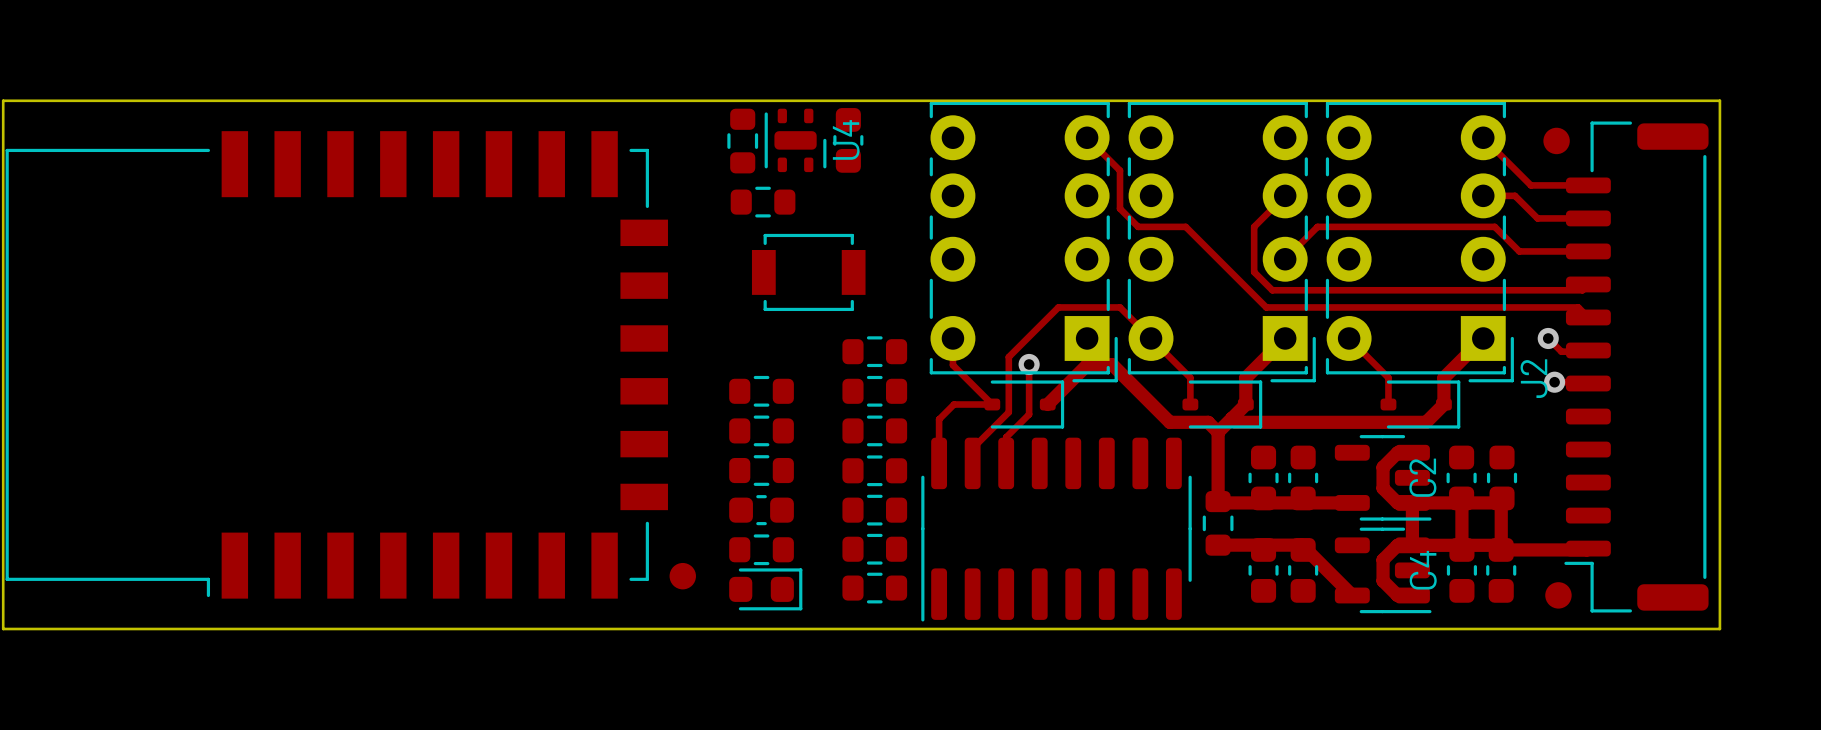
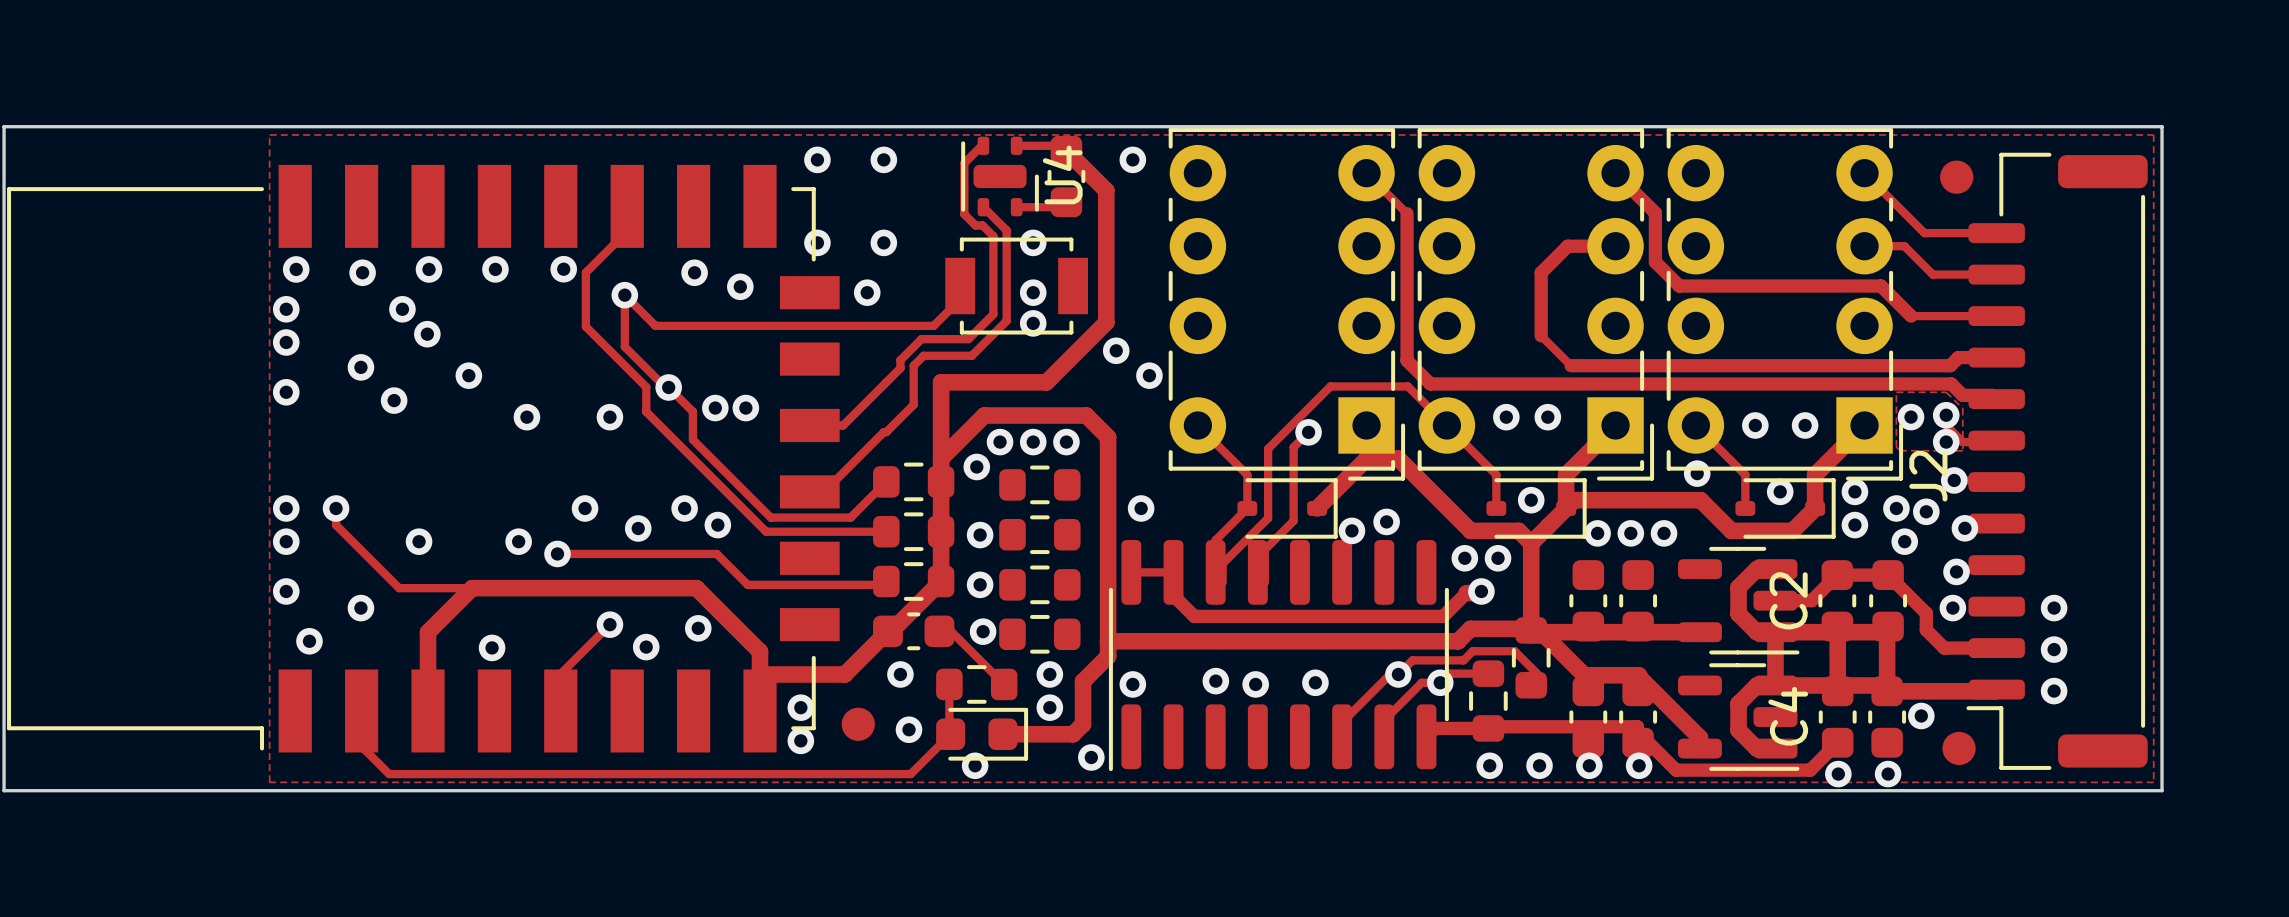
zone outline: none -> (269, 134) (269, 782) (2153, 782) (2153, 134) (269, 134)
track: none -> (983, 145) (964, 163) (964, 214) (975, 225) (982, 225) (993, 236) (993, 314) (968, 339) (921, 339) (900, 360) (900, 368) (843, 425) (809, 425)
track: none -> (1016, 145) (1061, 145) (1106, 190) (1106, 322) (1046, 382) (941, 382) (941, 581) (844, 674) (764, 674) (760, 678)
via: none -> (817, 159)
via: none -> (883, 159)
via: none -> (1132, 159)
part: (742, 141) -> none
track: none -> (1066, 202) (1061, 207) (1016, 207)
track: none -> (627, 206) (627, 231) (585, 272) (585, 326) (646, 387) (646, 411) (766, 531) (886, 531)
track: none -> (983, 207) (1006, 230) (1006, 320) (971, 355) (923, 355) (913, 365) (913, 404) (824, 491) (809, 491)
track: (1119, 169) (1120, 208) (1138, 226) (1185, 226) (1226, 267) -> (1615, 246) (1567, 246) (1541, 272) (1541, 335)
track: none -> (1407, 213) (1407, 360) (1430, 383) (1951, 383) (1962, 395) (1992, 395)
via: none -> (817, 242)
via: none -> (883, 242)
via: none -> (1033, 242)
track: (1285, 195) (1254, 226) (1254, 272) (1272, 290) (1582, 290) (1588, 284) -> none
part: (763, 202) -> none
via: none -> (296, 269)
via: none -> (429, 269)
via: none -> (495, 269)
via: none -> (563, 269)
via: none -> (362, 272)
via: none -> (694, 272)
track: none -> (960, 286) (960, 299) (933, 325) (655, 325) (624, 295) (624, 346) (692, 411) (692, 439) (770, 517) (850, 517) (886, 481)
via: none -> (740, 286)
via: none -> (867, 292)
via: none -> (1033, 292)
via: none -> (624, 295)
via: none -> (286, 309)
via: none -> (402, 309)
track: (1520, 251) (1494, 226) (1317, 226) (1285, 259) -> (1911, 316) (1881, 286) (1679, 286) (1655, 262) (1655, 213) (1615, 173)
via: none -> (1033, 323)
via: none -> (427, 334)
via: none -> (286, 342)
part position: (808, 272) -> (1016, 286)
via: none -> (1116, 350)
track: (1249, 290) (1266, 307) (1578, 307) (1585, 314) -> (1571, 365) (1950, 365) (1958, 357) (1996, 357)
via: none -> (360, 367)
via: none -> (468, 375)
via: none -> (1149, 375)
via: none -> (668, 387)
via: none -> (286, 392)
zone outline: none -> (1896, 392) (1896, 446) (1900, 450) (1962, 450) (1962, 408) (1946, 392) (1896, 392)
via: none -> (394, 400)
via: none -> (715, 408)
via: none -> (745, 408)
via: none -> (1946, 415)
via: none -> (526, 417)
via: none -> (609, 417)
via: none -> (1506, 417)
via: none -> (1547, 417)
via: none -> (1911, 417)
track: (952, 338) (952, 365) (992, 404) (954, 404) (939, 419) (939, 463) -> (1197, 425) (1247, 474) (1247, 508) (1215, 540) (1215, 572)
via: none -> (1755, 425)
via: none -> (1805, 425)
via: (1548, 338) -> none
track: none -> (1308, 432) (1293, 447) (1293, 458)
via: none -> (1000, 442)
via: none -> (1033, 442)
via: none -> (1066, 442)
part: (874, 351) -> none
via: none -> (1946, 442)
track: none -> (941, 458) (984, 415) (1086, 415) (1108, 437) (1108, 656) (1083, 681) (1083, 724) (1073, 734) (1002, 734)
via position: (1029, 364) -> (1308, 432)
via: none -> (976, 466)
via: none -> (1697, 473)
part: none -> (913, 481)
part: none -> (1039, 484)
part: (761, 391) -> none
part: (874, 391) -> none
via: none -> (1780, 491)
via: none -> (1854, 491)
via: none -> (1531, 500)
via: none -> (286, 508)
track: none -> (336, 508) (336, 525) (399, 588) (472, 588)
via: none -> (336, 508)
via: none -> (585, 508)
via: none -> (684, 508)
via: none -> (1141, 508)
via: none -> (1896, 508)
via: none -> (1926, 511)
via: none -> (1386, 521)
via: none -> (717, 525)
via: none -> (1854, 525)
track: (1231, 418) (1235, 422) (1377, 422) -> (1566, 508) (1574, 500) (1700, 500) (1731, 530)
via: none -> (638, 528)
via: none -> (1964, 528)
part: none -> (913, 531)
via: none -> (1351, 530)
via: none -> (1597, 533)
via: none -> (1630, 533)
via: none -> (1664, 533)
via: none -> (980, 535)
part: none -> (1039, 534)
via: none -> (286, 541)
via: none -> (419, 541)
via: none -> (518, 541)
part: (761, 430) -> none
part: (874, 430) -> none
via: none -> (1904, 541)
track: none -> (557, 553) (716, 553) (747, 584) (883, 584) (886, 581)
via: none -> (557, 553)
via: none -> (1464, 558)
via: none -> (1498, 558)
via: none -> (1956, 571)
track: none -> (1131, 572) (1173, 572) (1173, 595) (1194, 616) (1443, 616) (1466, 593) (1481, 591)
part: none -> (913, 581)
via: none -> (980, 584)
part: none -> (1039, 584)
track: none -> (472, 588) (696, 588) (760, 651) (760, 711)
track: none -> (472, 588) (428, 632) (428, 711)
via: none -> (286, 591)
part: (761, 470) -> none
part: (874, 470) -> none
via: none -> (1481, 591)
track: none -> (1775, 600) (1811, 600) (1837, 575) (1888, 575) (1926, 613) (1926, 630) (1944, 648) (1996, 648)
via: none -> (360, 608)
via: none -> (1952, 608)
via: none -> (2054, 608)
track: none -> (609, 624) (560, 673) (560, 711)
via: none -> (609, 624)
via: none -> (698, 628)
track: none -> (939, 631) (951, 631) (1004, 684)
via: none -> (983, 631)
part: none -> (1039, 634)
via: none -> (309, 641)
part position: (761, 510) -> (913, 631)
part: (874, 510) -> none
track: none -> (1108, 641) (1458, 641) (1470, 628) (1537, 628) (1584, 675) (1639, 675)
via: none -> (646, 647)
via: none -> (492, 647)
via: none -> (2054, 649)
part position: (1056, 529) -> (1278, 655)
track: none -> (1488, 673) (1449, 673) (1440, 682) (1421, 682) (1384, 720) (1384, 736)
track: none -> (1537, 673) (1514, 651) (1472, 651) (1463, 660) (1412, 660) (1398, 674) (1390, 674) (1342, 722) (1342, 736)
via: none -> (900, 674)
via: none -> (1049, 674)
via: none -> (1398, 674)
via: none -> (1215, 681)
via: none -> (1315, 682)
via: none -> (1440, 682)
track: none -> (949, 684) (950, 734) (910, 774) (389, 774) (361, 746) (361, 711)
via: none -> (1132, 684)
via: none -> (1255, 684)
track: (1218, 545) (1301, 545) (1352, 595) -> (1637, 675) (1699, 737) (1699, 748)
part position: (761, 549) -> (976, 684)
part: (874, 549) -> none
via: none -> (2054, 691)
part: none -> (1488, 701)
via: none -> (800, 707)
via: none -> (1049, 707)
via: none -> (1921, 715)
via: none -> (909, 729)
track: none -> (1426, 736) (1434, 728) (1637, 726) (1637, 731) (1676, 770) (1810, 770) (1837, 742)
part: (874, 588) -> none
via: none -> (800, 740)
part position: (765, 589) -> (982, 734)
via: none -> (1091, 757)
via: none -> (975, 765)
via: none -> (1489, 765)
via: none -> (1539, 765)
via: none -> (1589, 765)
via: none -> (1639, 765)
via: none -> (1838, 774)
via: none -> (1888, 774)

